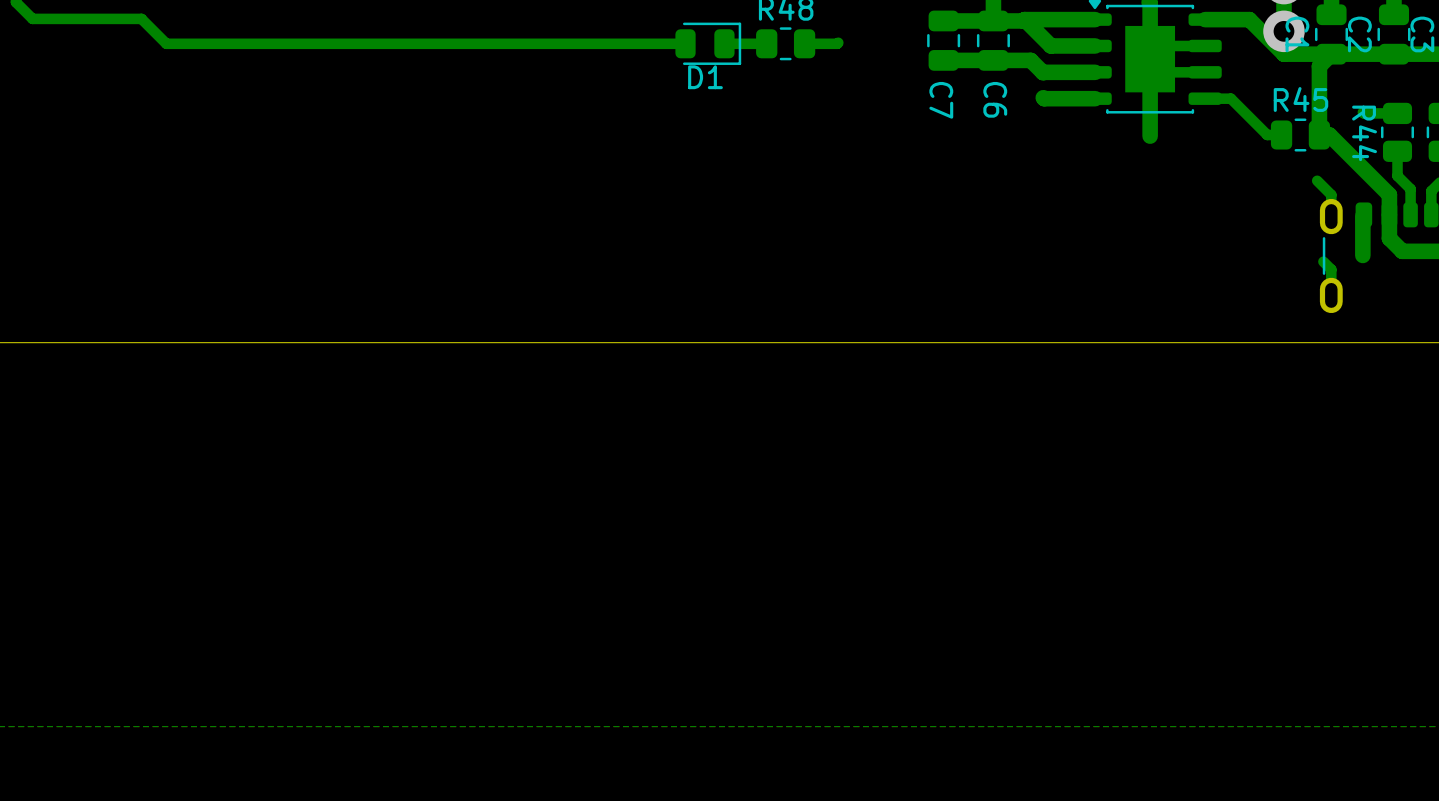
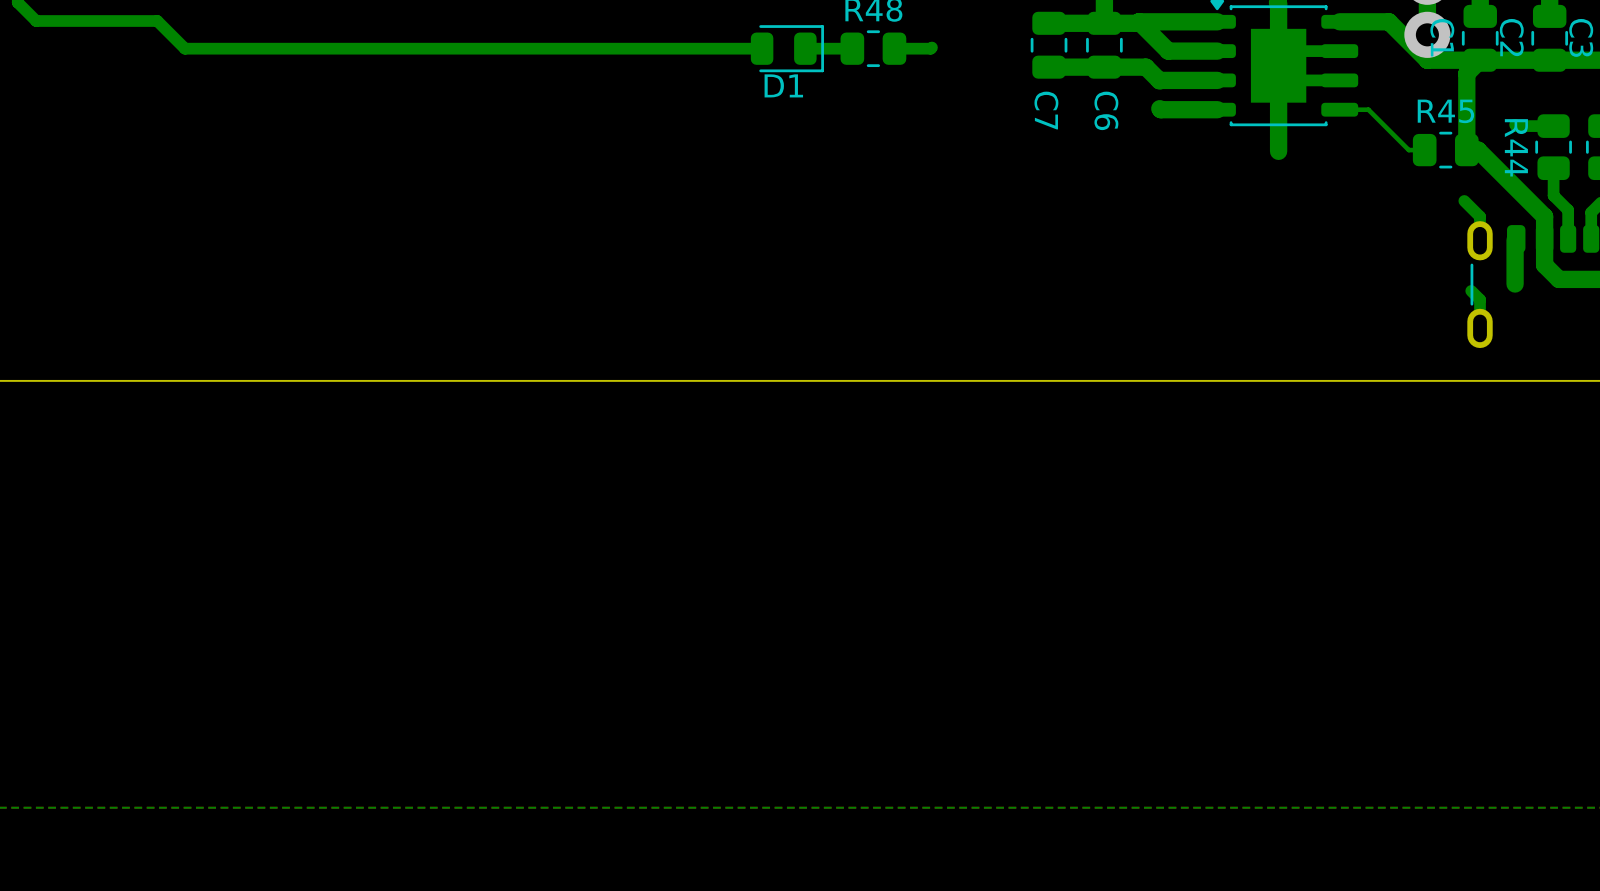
bottom track width: thick (1205, 98) (1230, 98) (1267, 135) (1281, 135) -> thin (1339, 109) (1368, 109) (1408, 150) (1424, 150)

